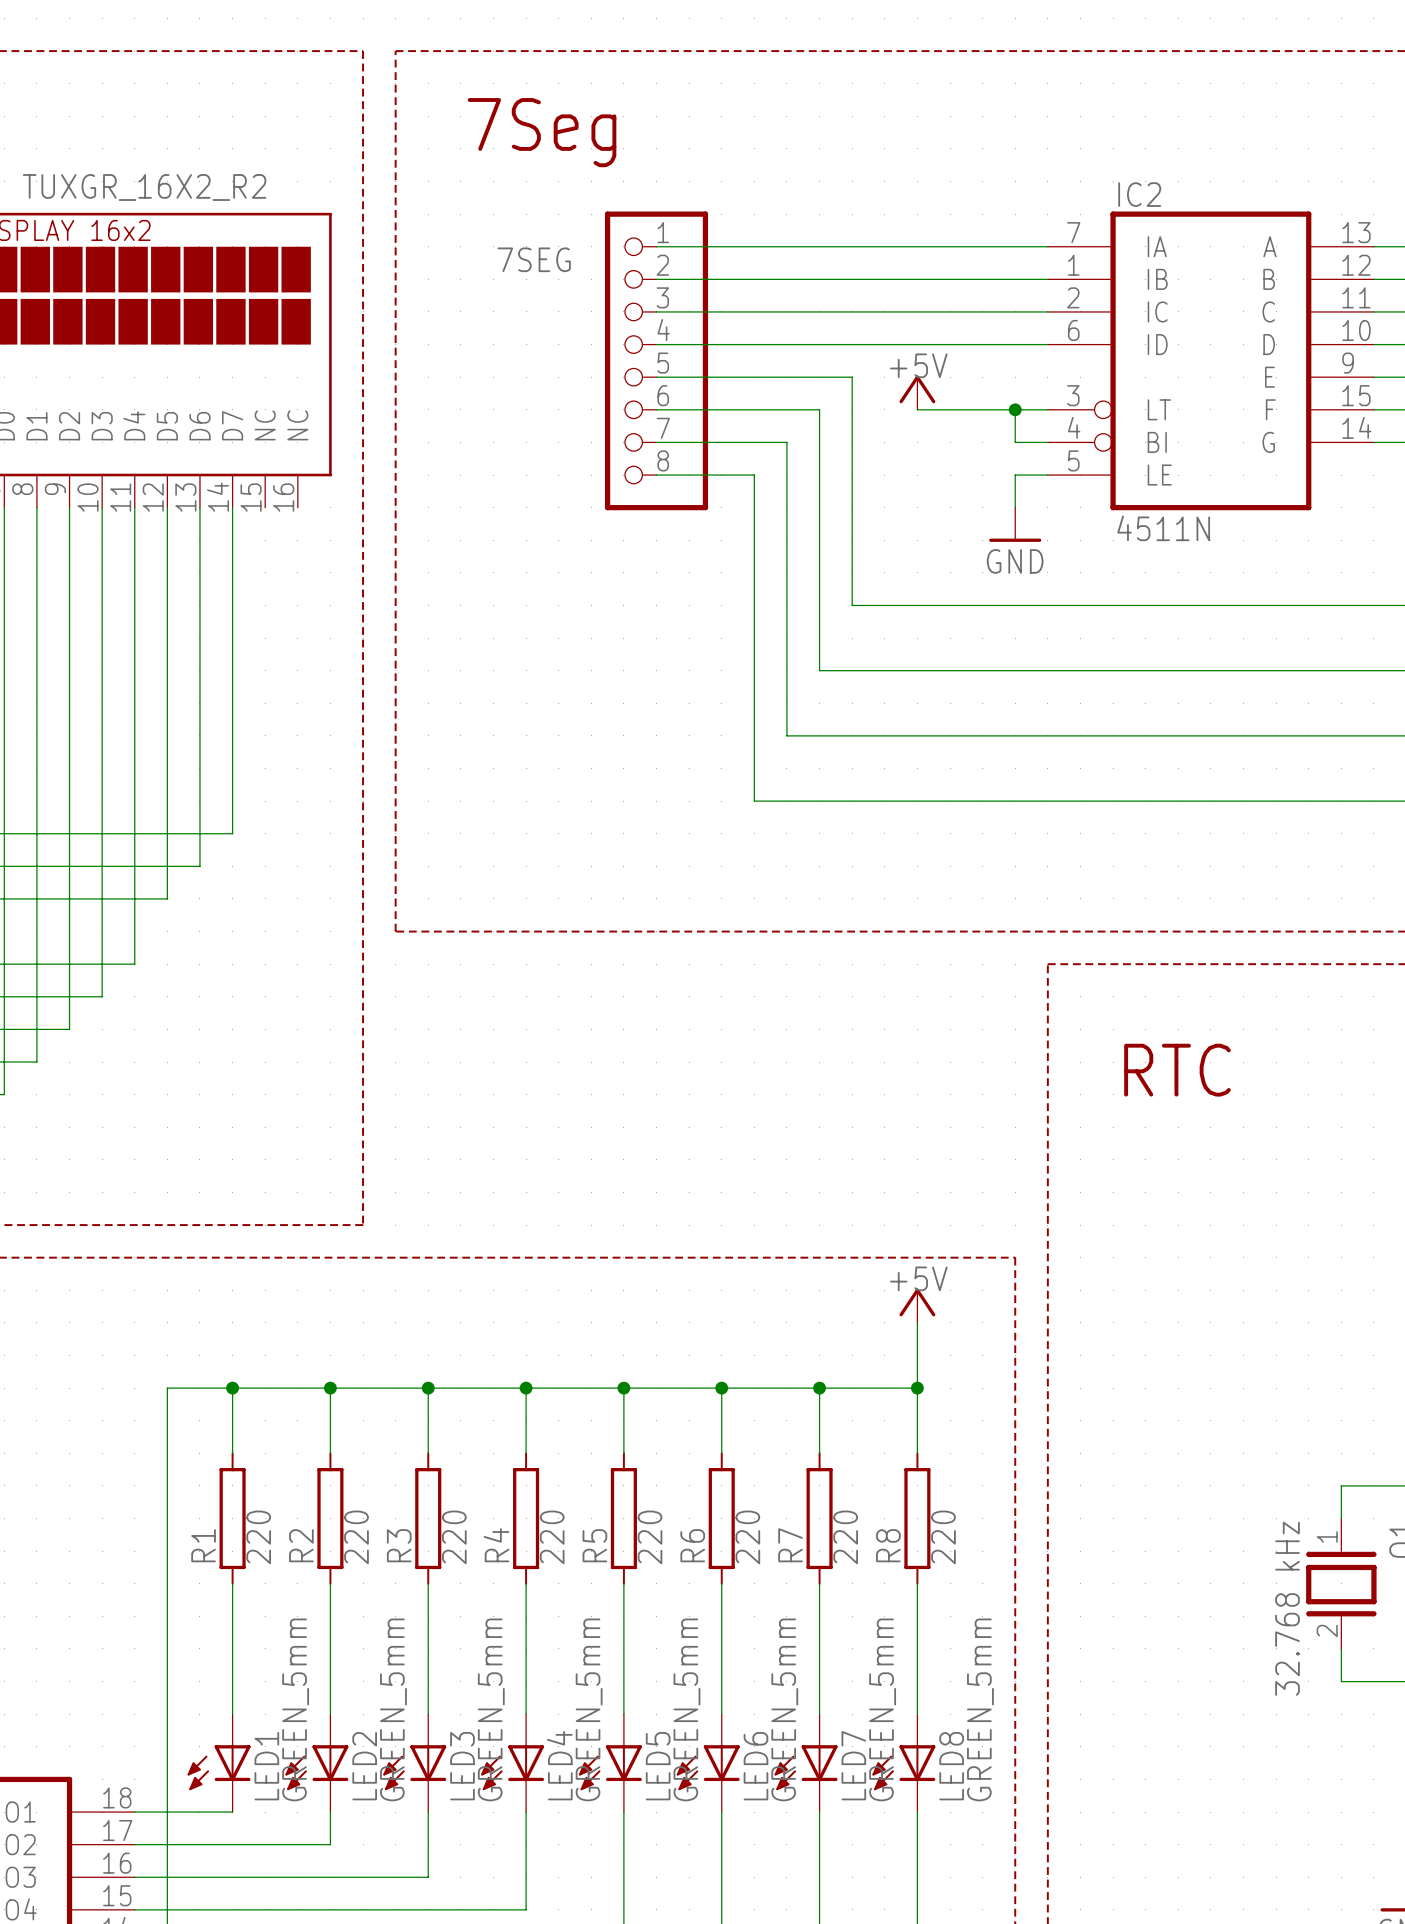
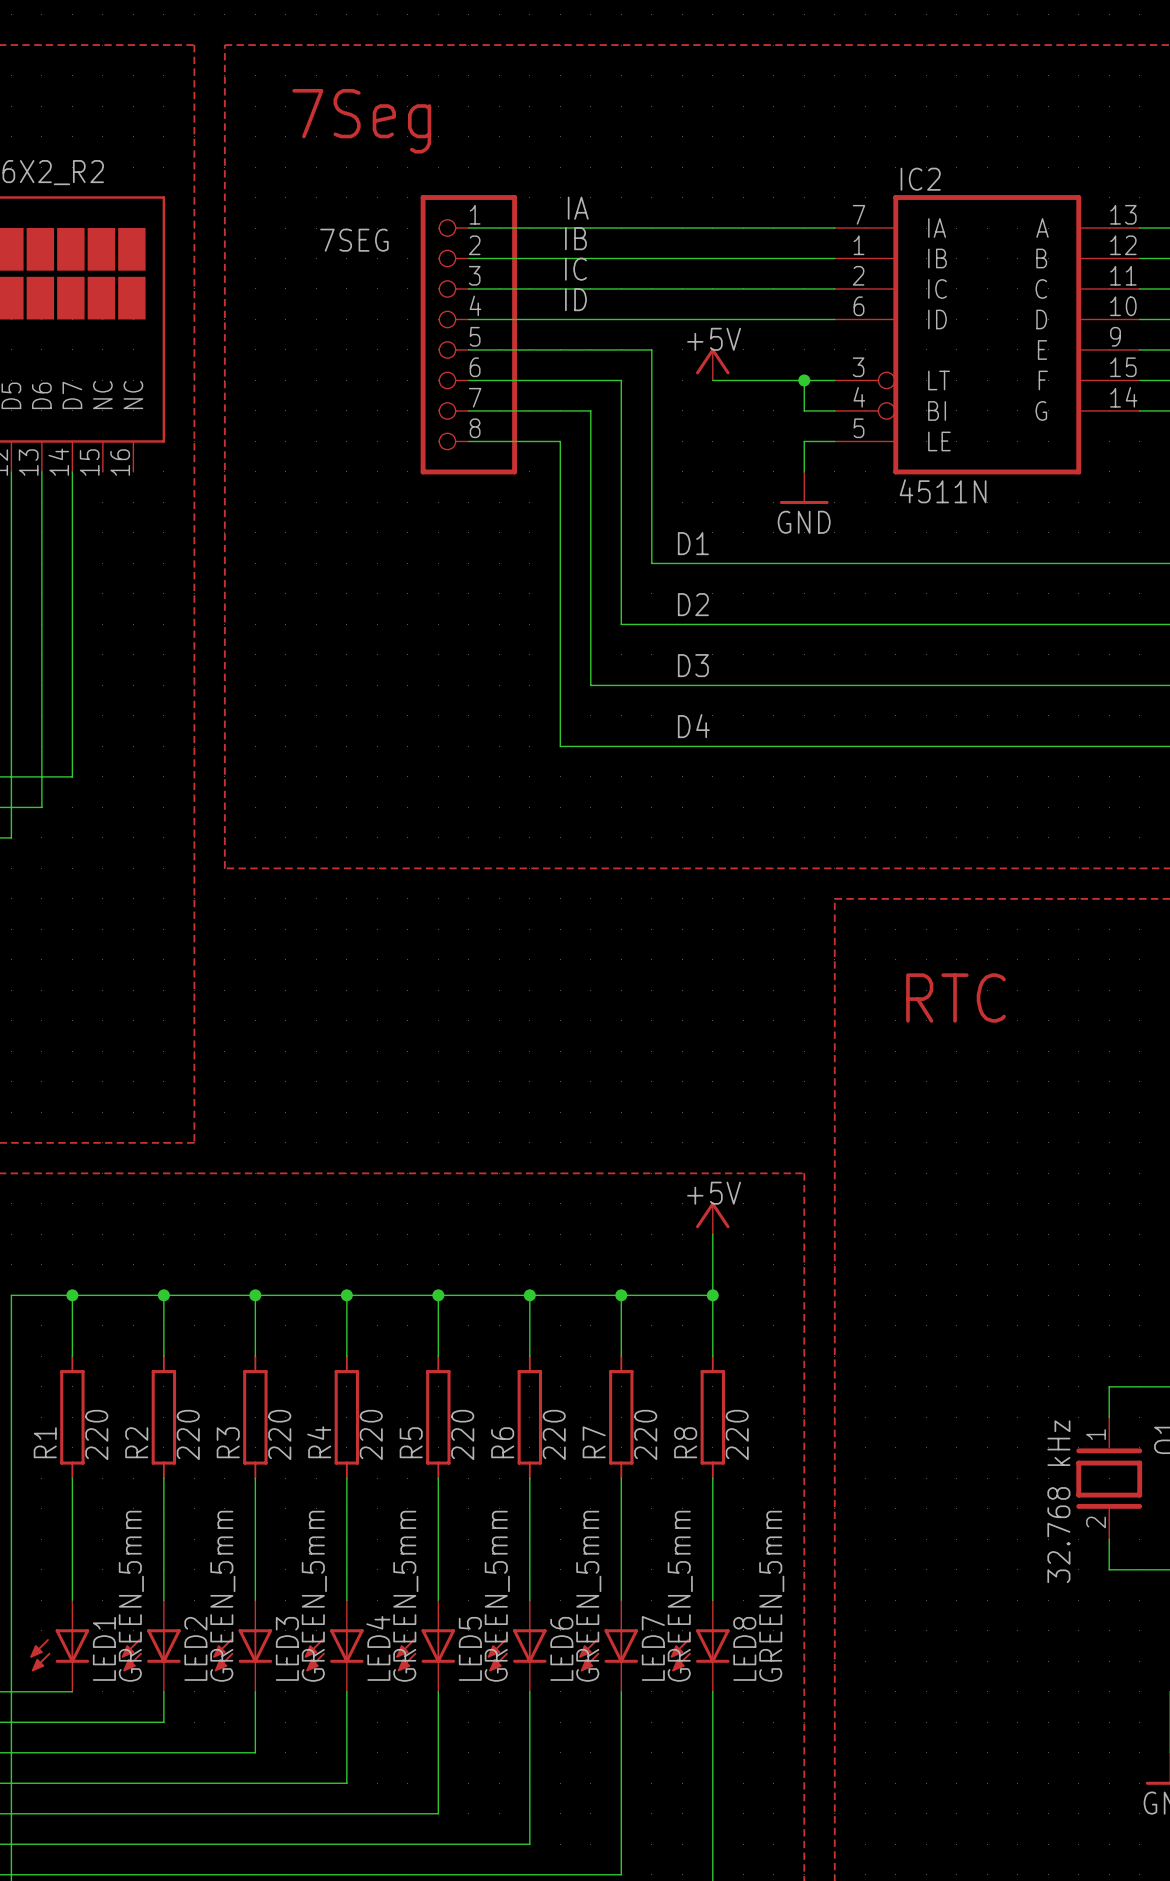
label: none -> IA (578, 208)
label: none -> IB (575, 238)
label: none -> IC (575, 269)
label: none -> ID (575, 299)
label: none -> D1 (693, 543)
label: none -> D2 (693, 604)
label: none -> D3 (693, 665)
label: none -> D4 (693, 726)

